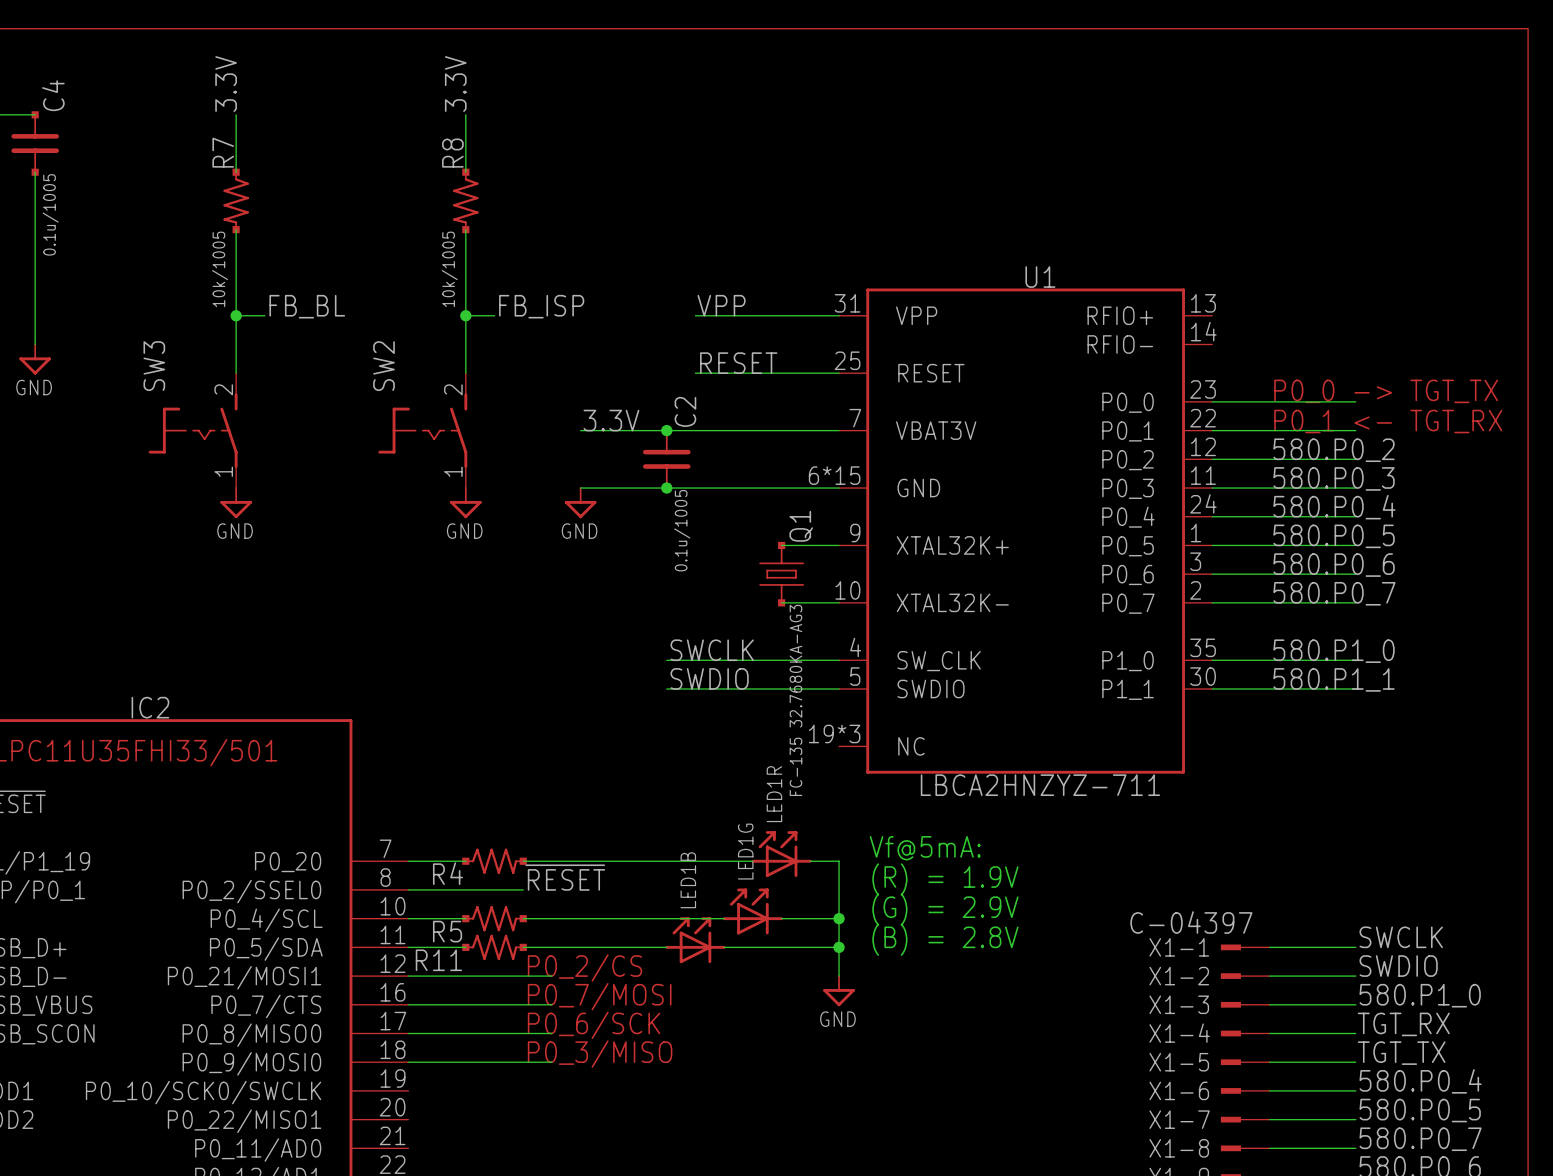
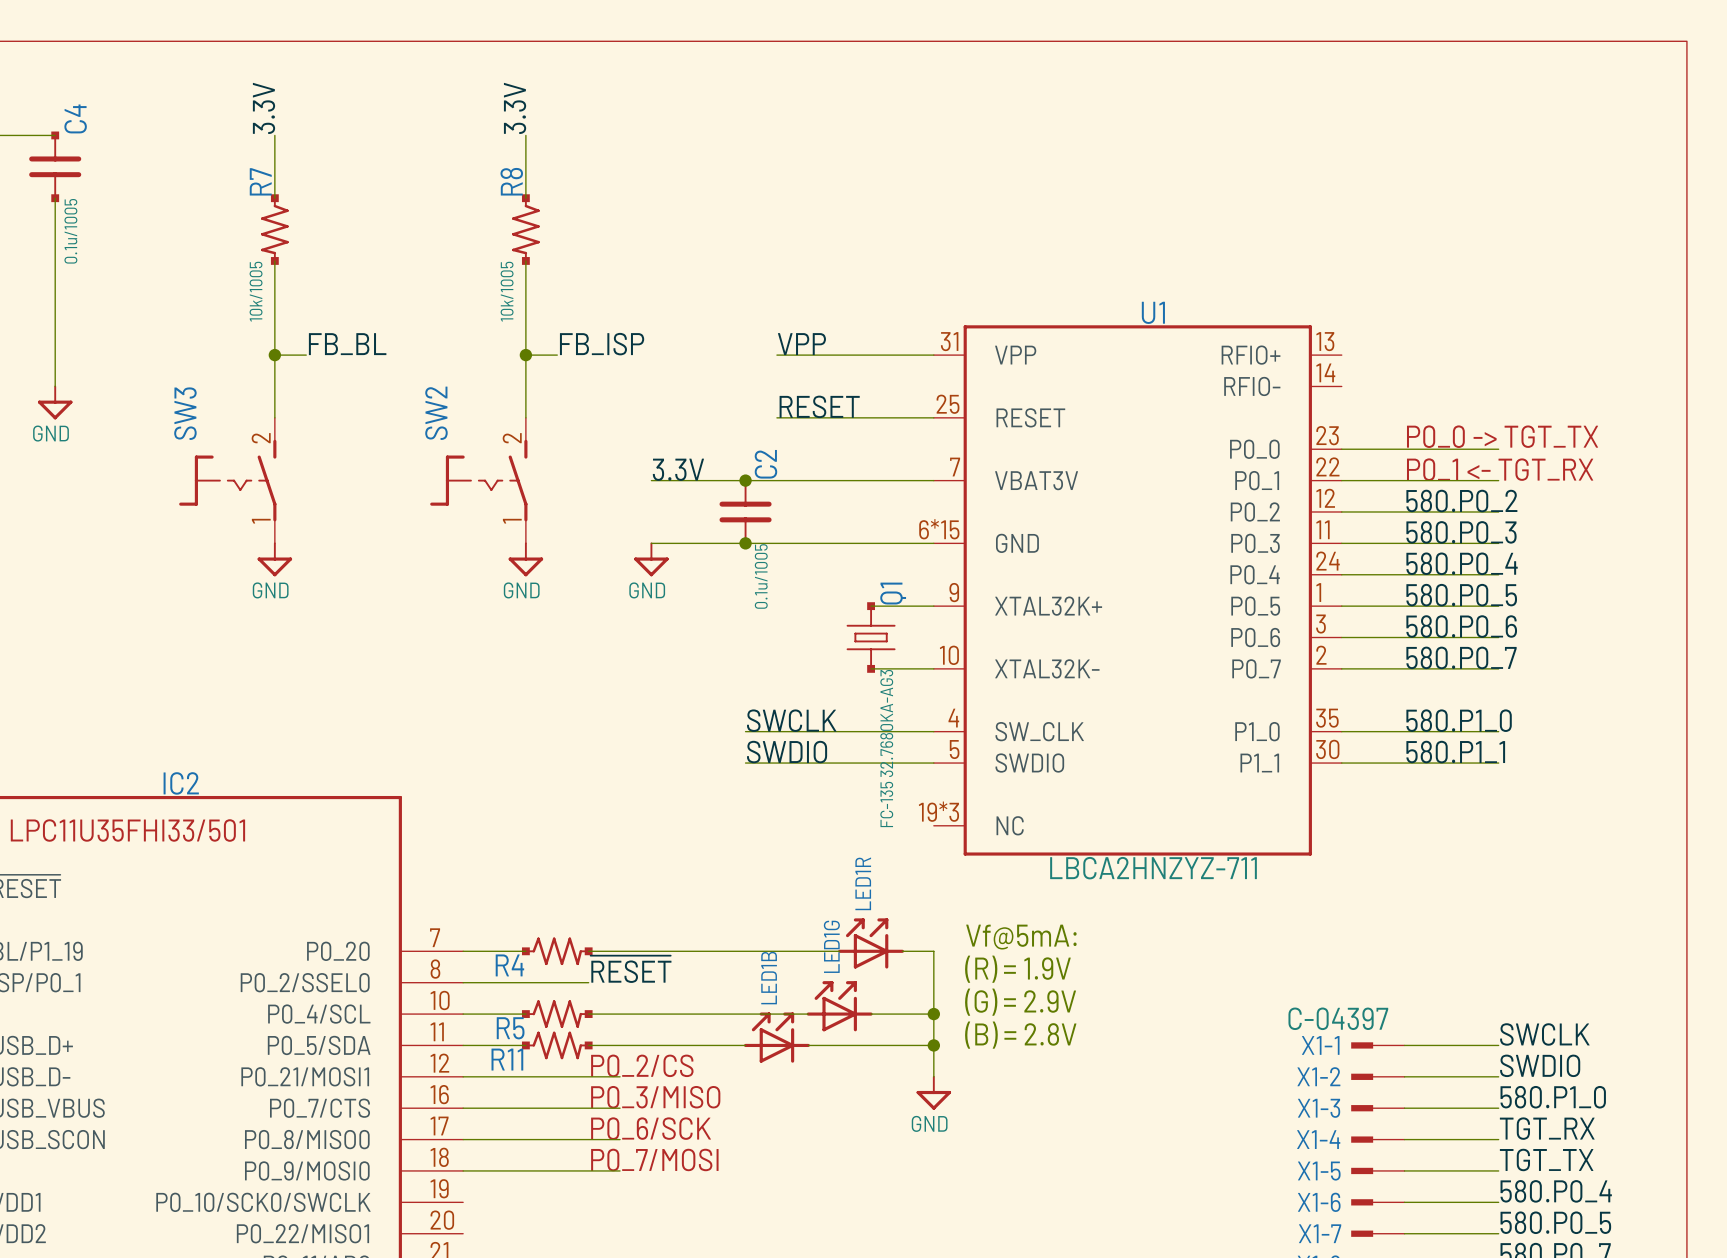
text: P0_7/MOSI (599, 996) -> P0_3/MISO (655, 1097)
text: P0_3/MISO (600, 1054) -> P0_7/MOSI (654, 1159)

